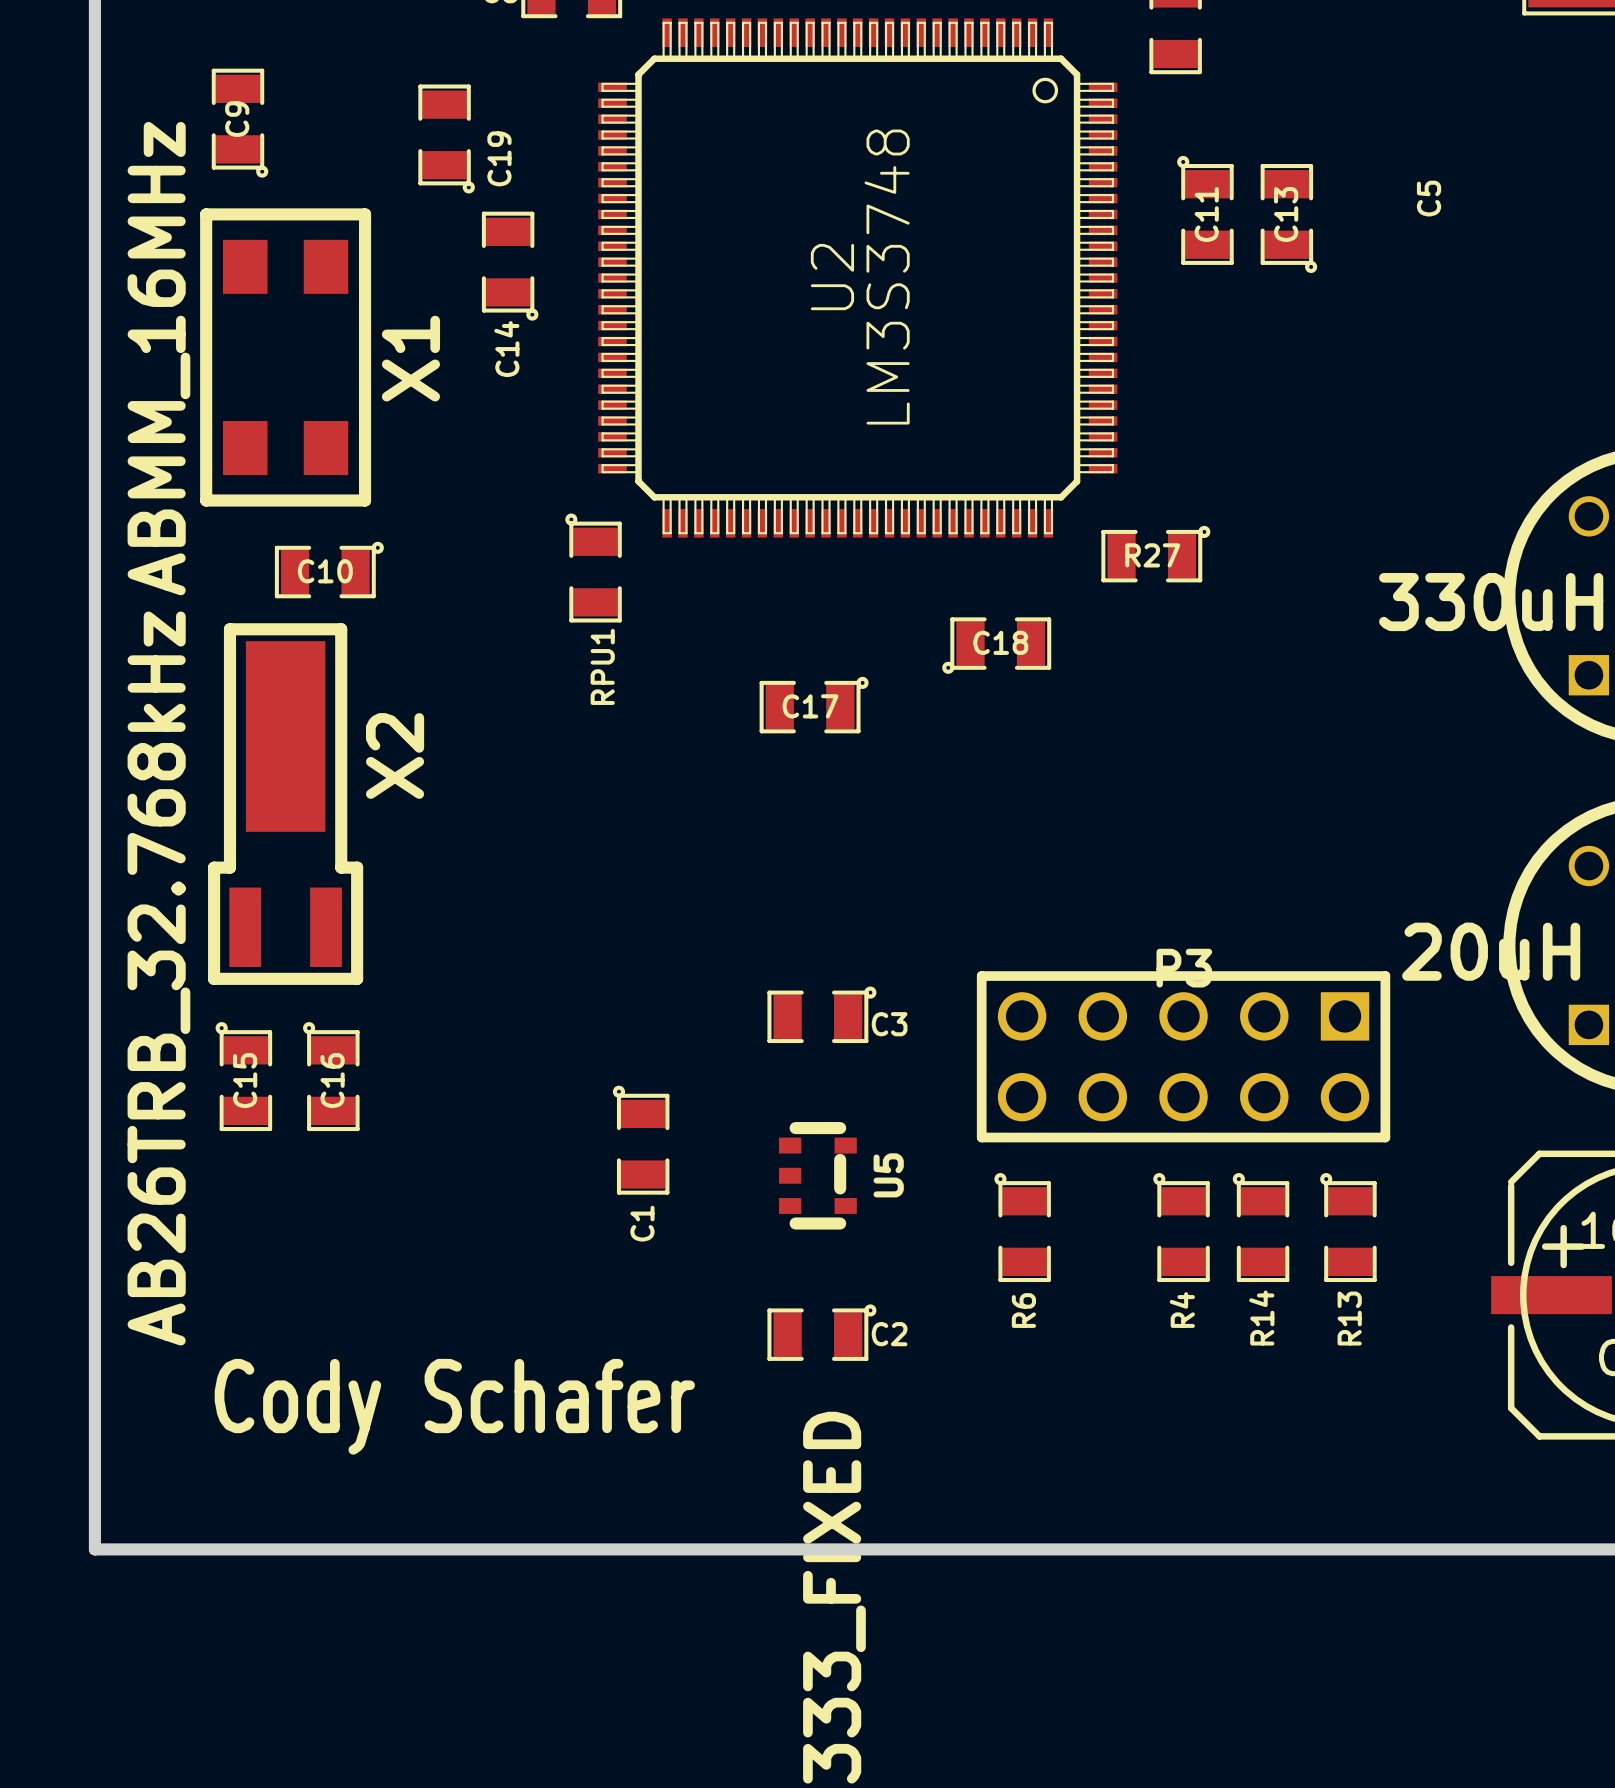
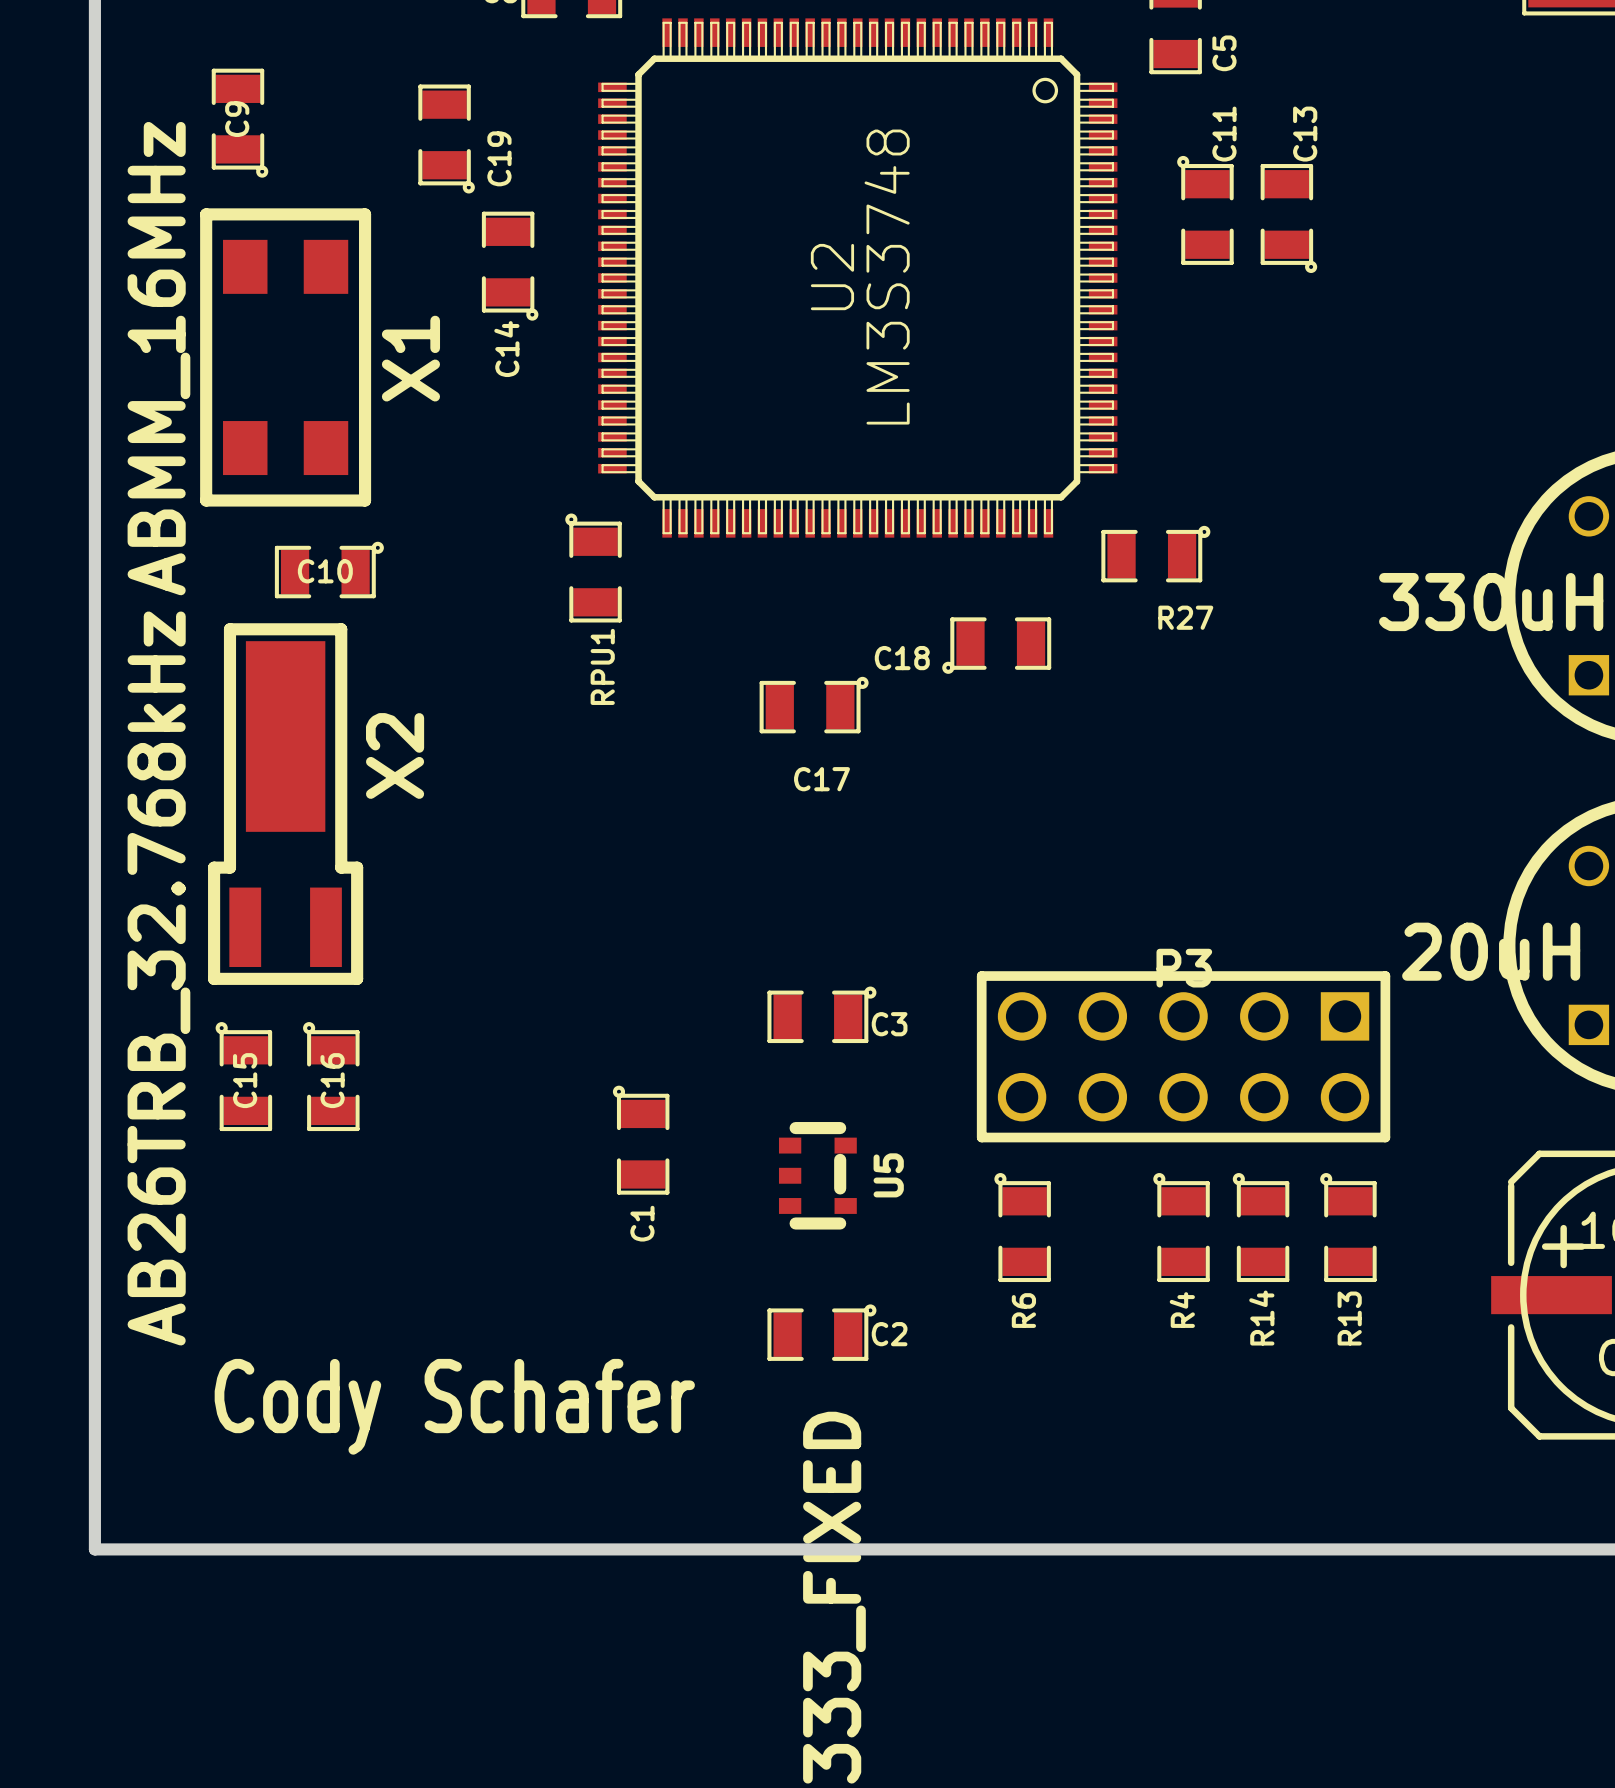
C5 name position: C5 (1429, 198) -> C5 (1224, 53)
C11 name position: C11 (1206, 214) -> C11 (1224, 134)
C13 name position: C13 (1286, 214) -> C13 (1305, 134)
R27 name position: R27 (1152, 555) -> R27 (1185, 617)
C18 name position: C18 (1000, 642) -> C18 (902, 658)
C17 name position: C17 (810, 706) -> C17 (822, 779)

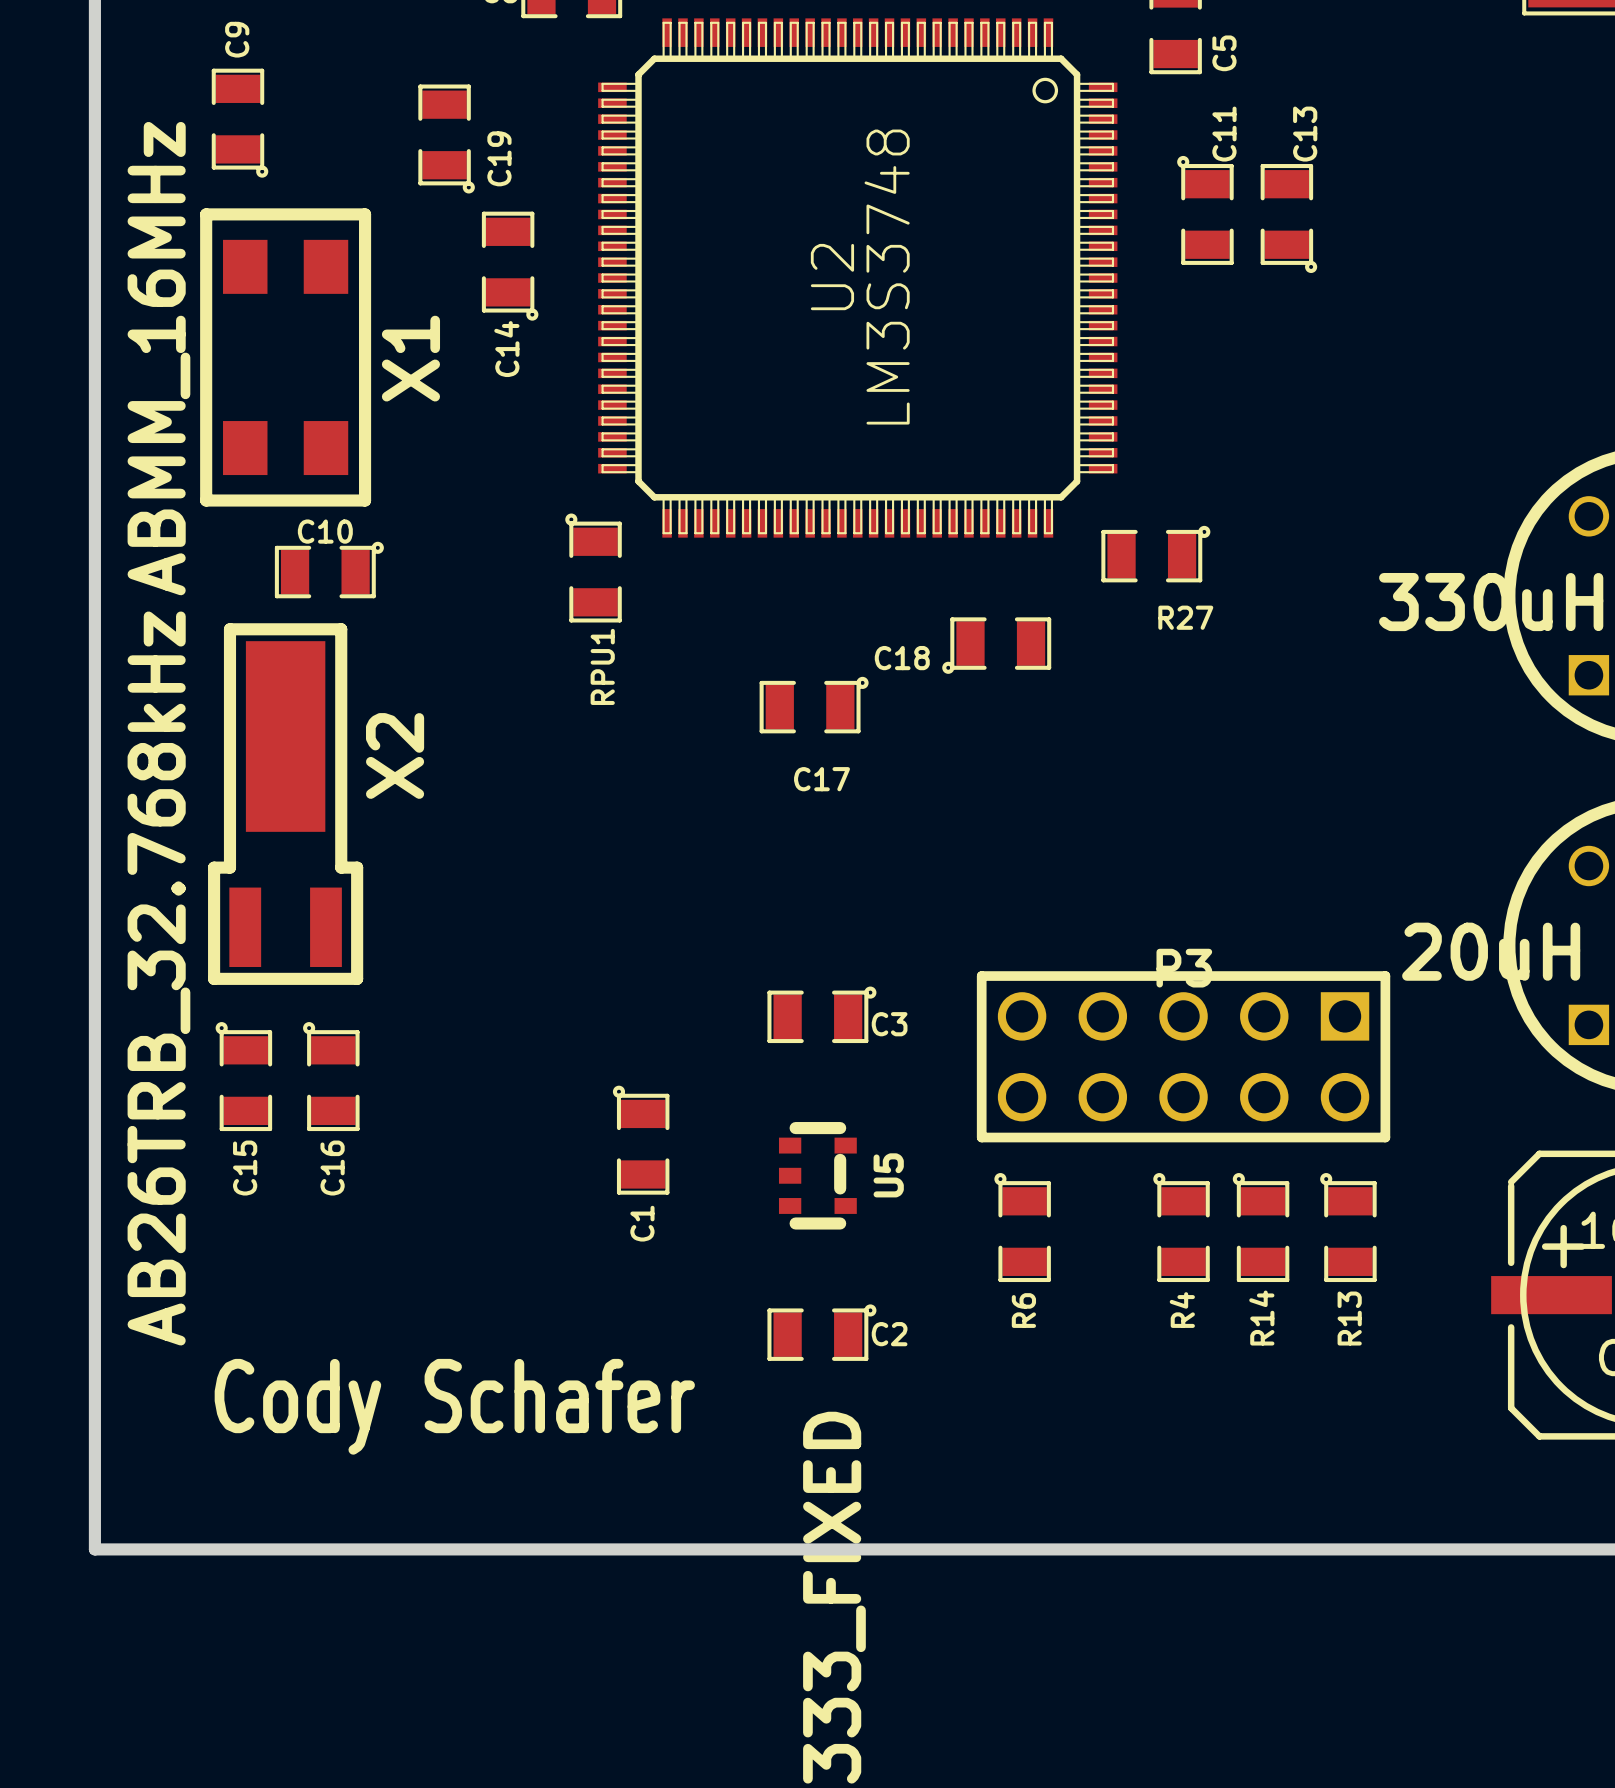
C9 name position: C9 (237, 119) -> C9 (237, 39)
C10 name position: C10 (325, 571) -> C10 (325, 531)
C15 name position: C15 (245, 1080) -> C15 (245, 1168)
C16 name position: C16 (332, 1080) -> C16 (332, 1168)

